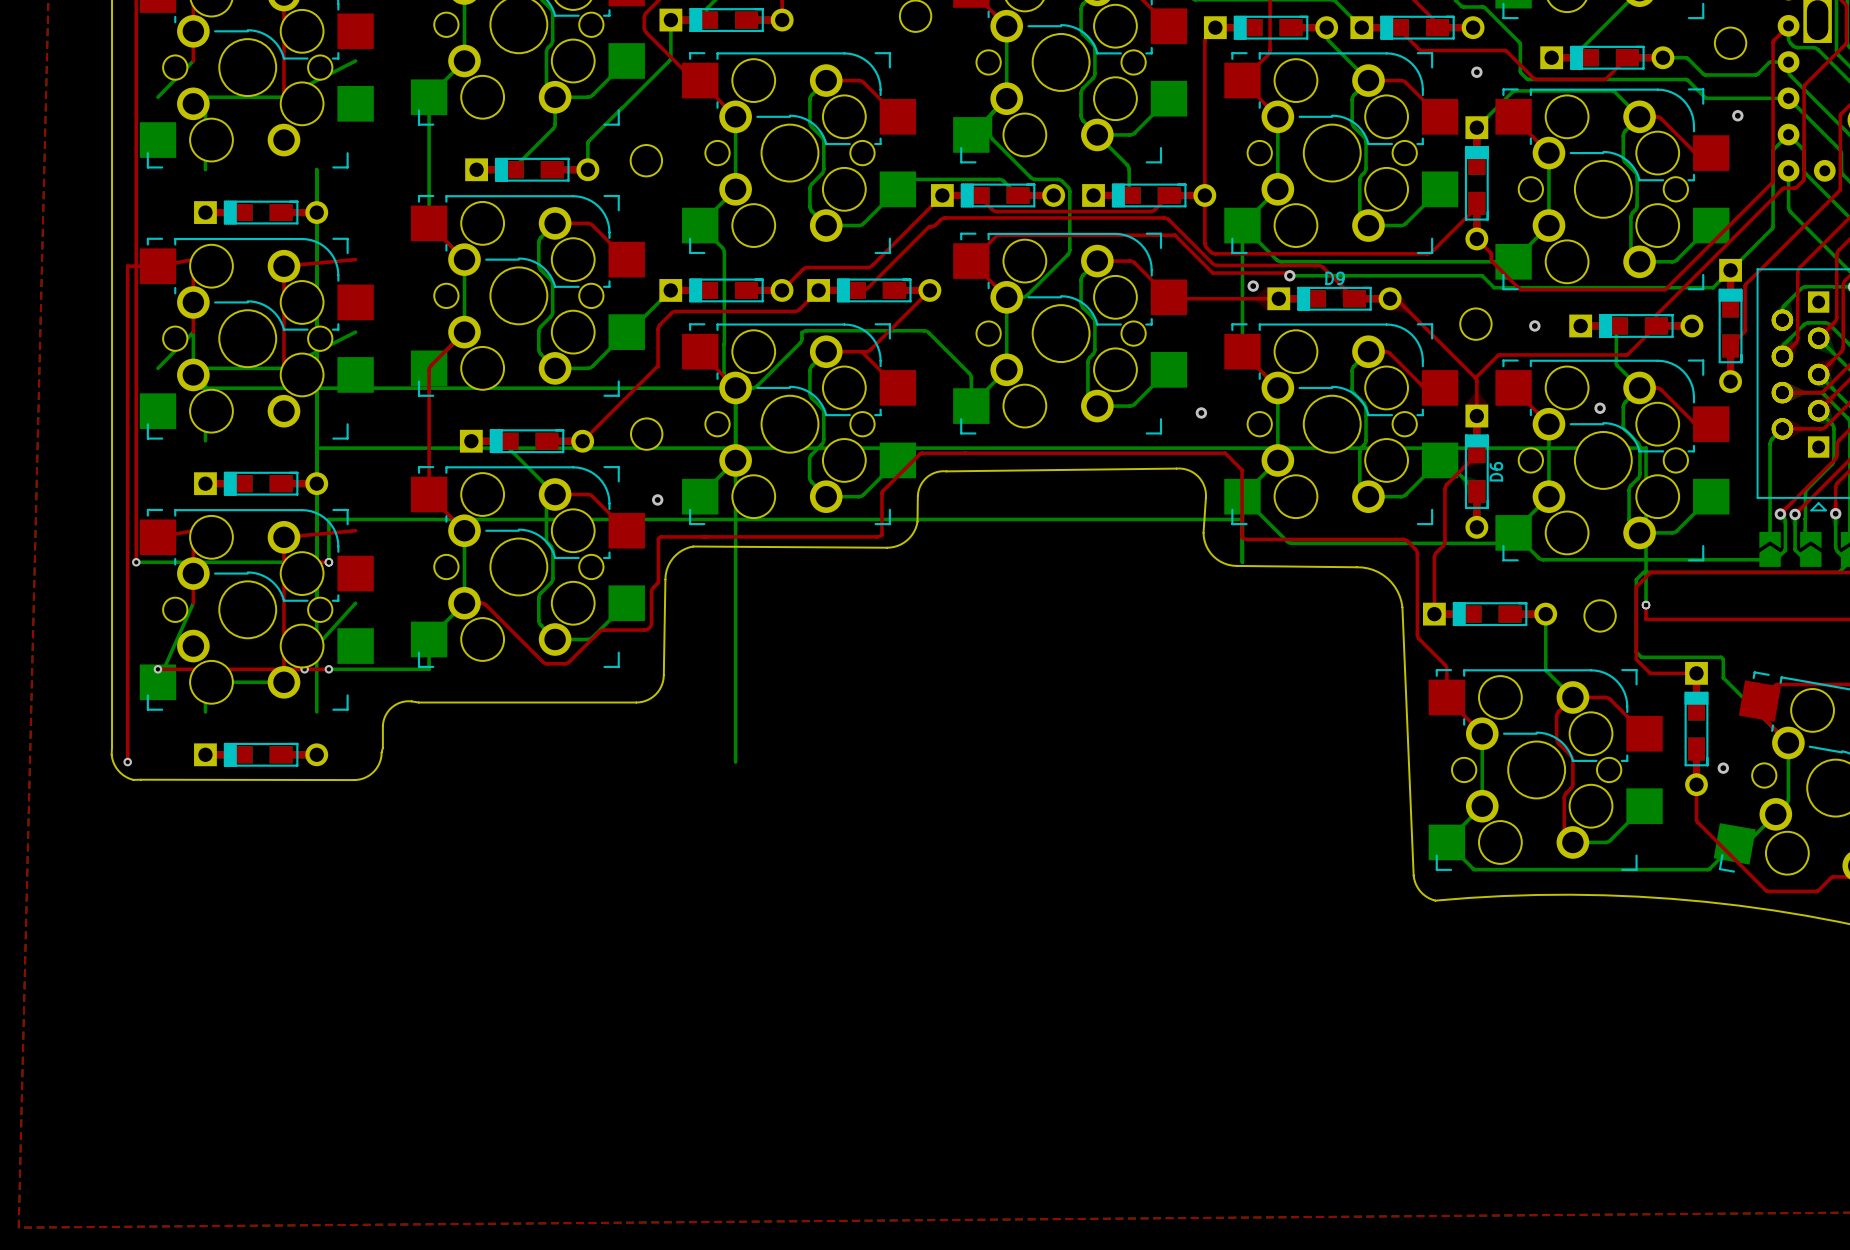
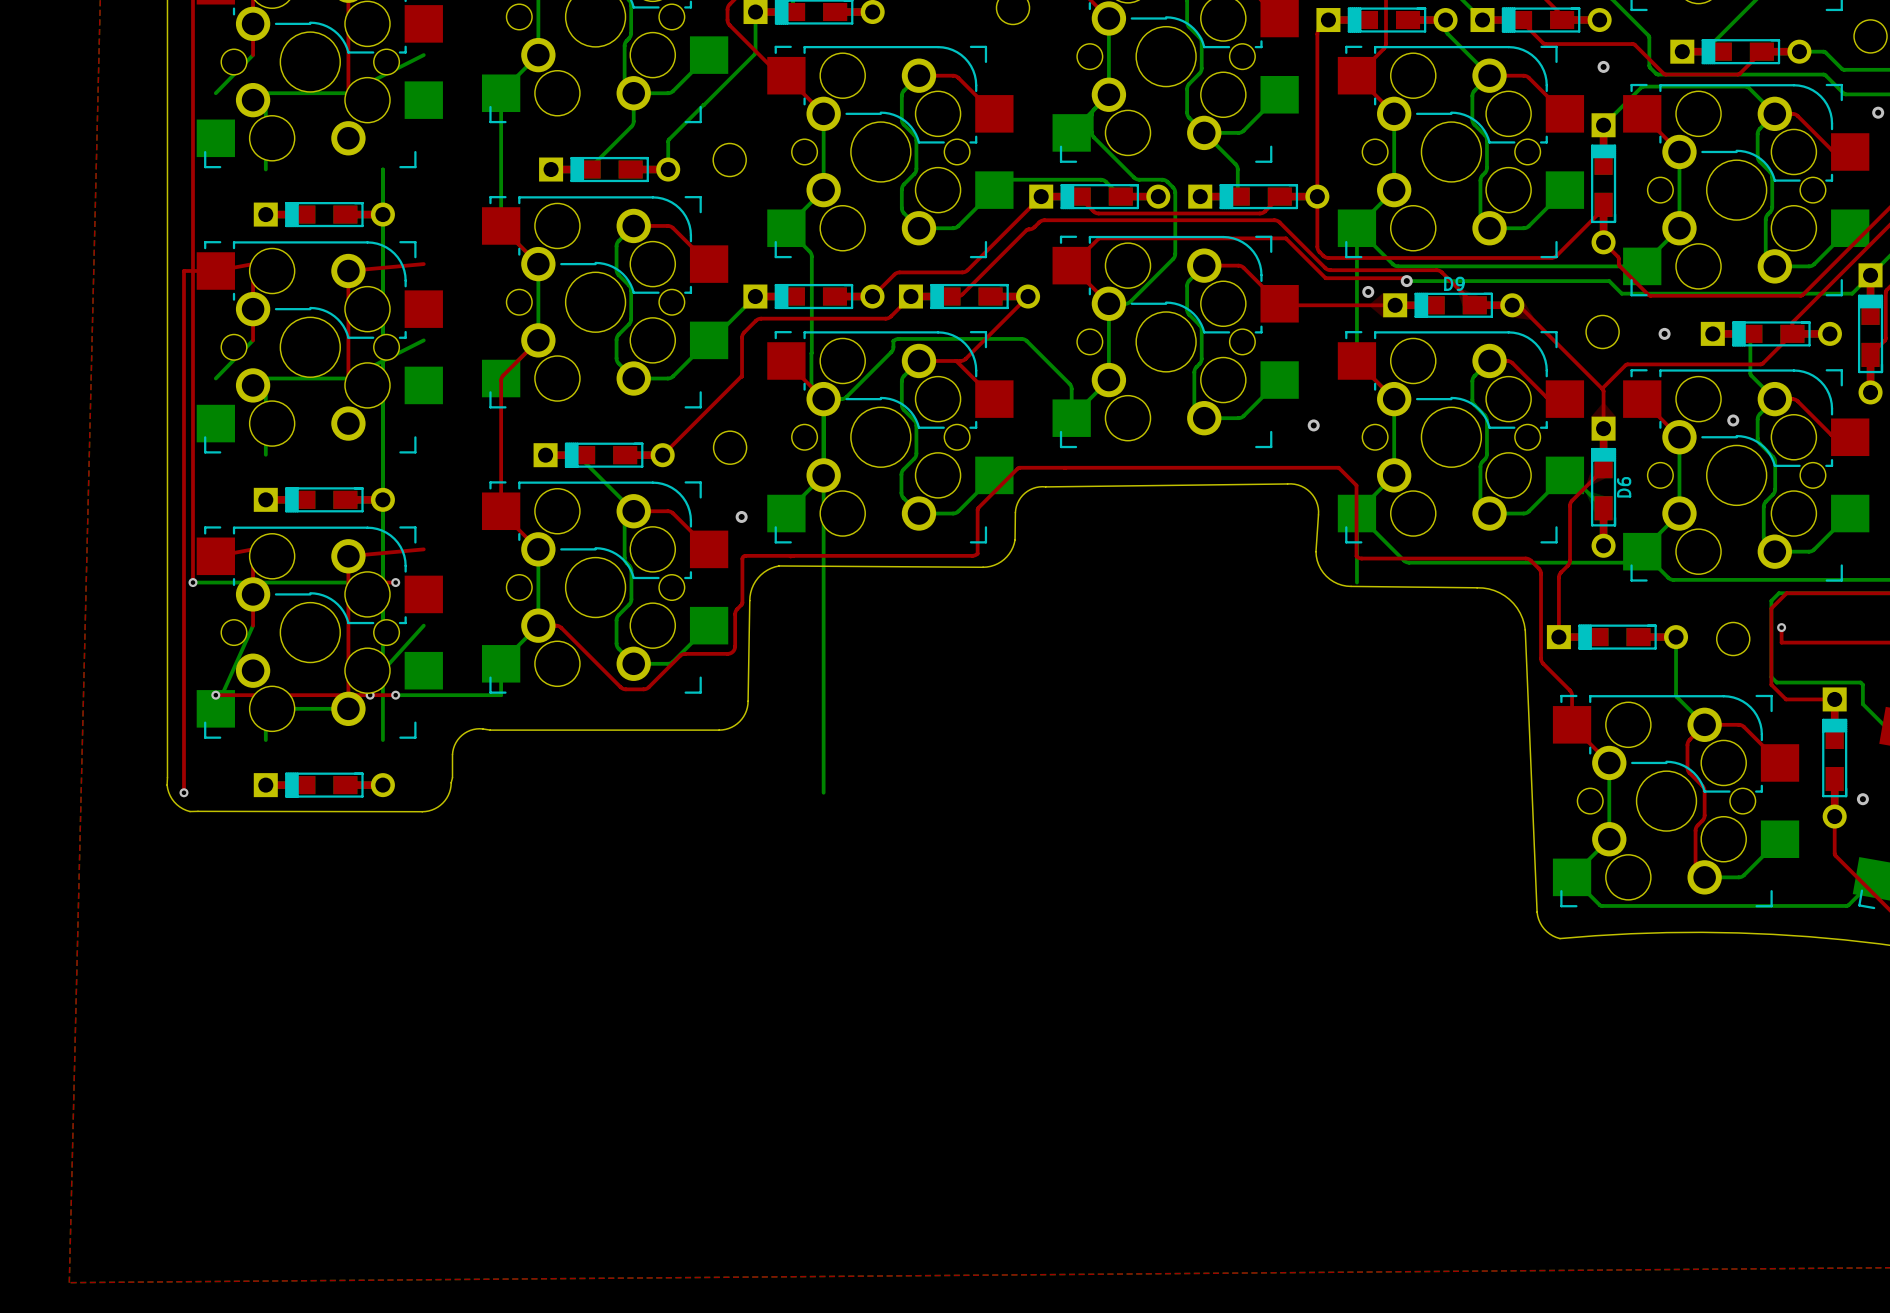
bottom track: (193, 332) (193, 388) (735, 388) -> none
bottom track: (316, 448) (1646, 448) (1646, 605) -> none
bottom track: (328, 562) (328, 519) (1242, 519) (1242, 562) -> none

